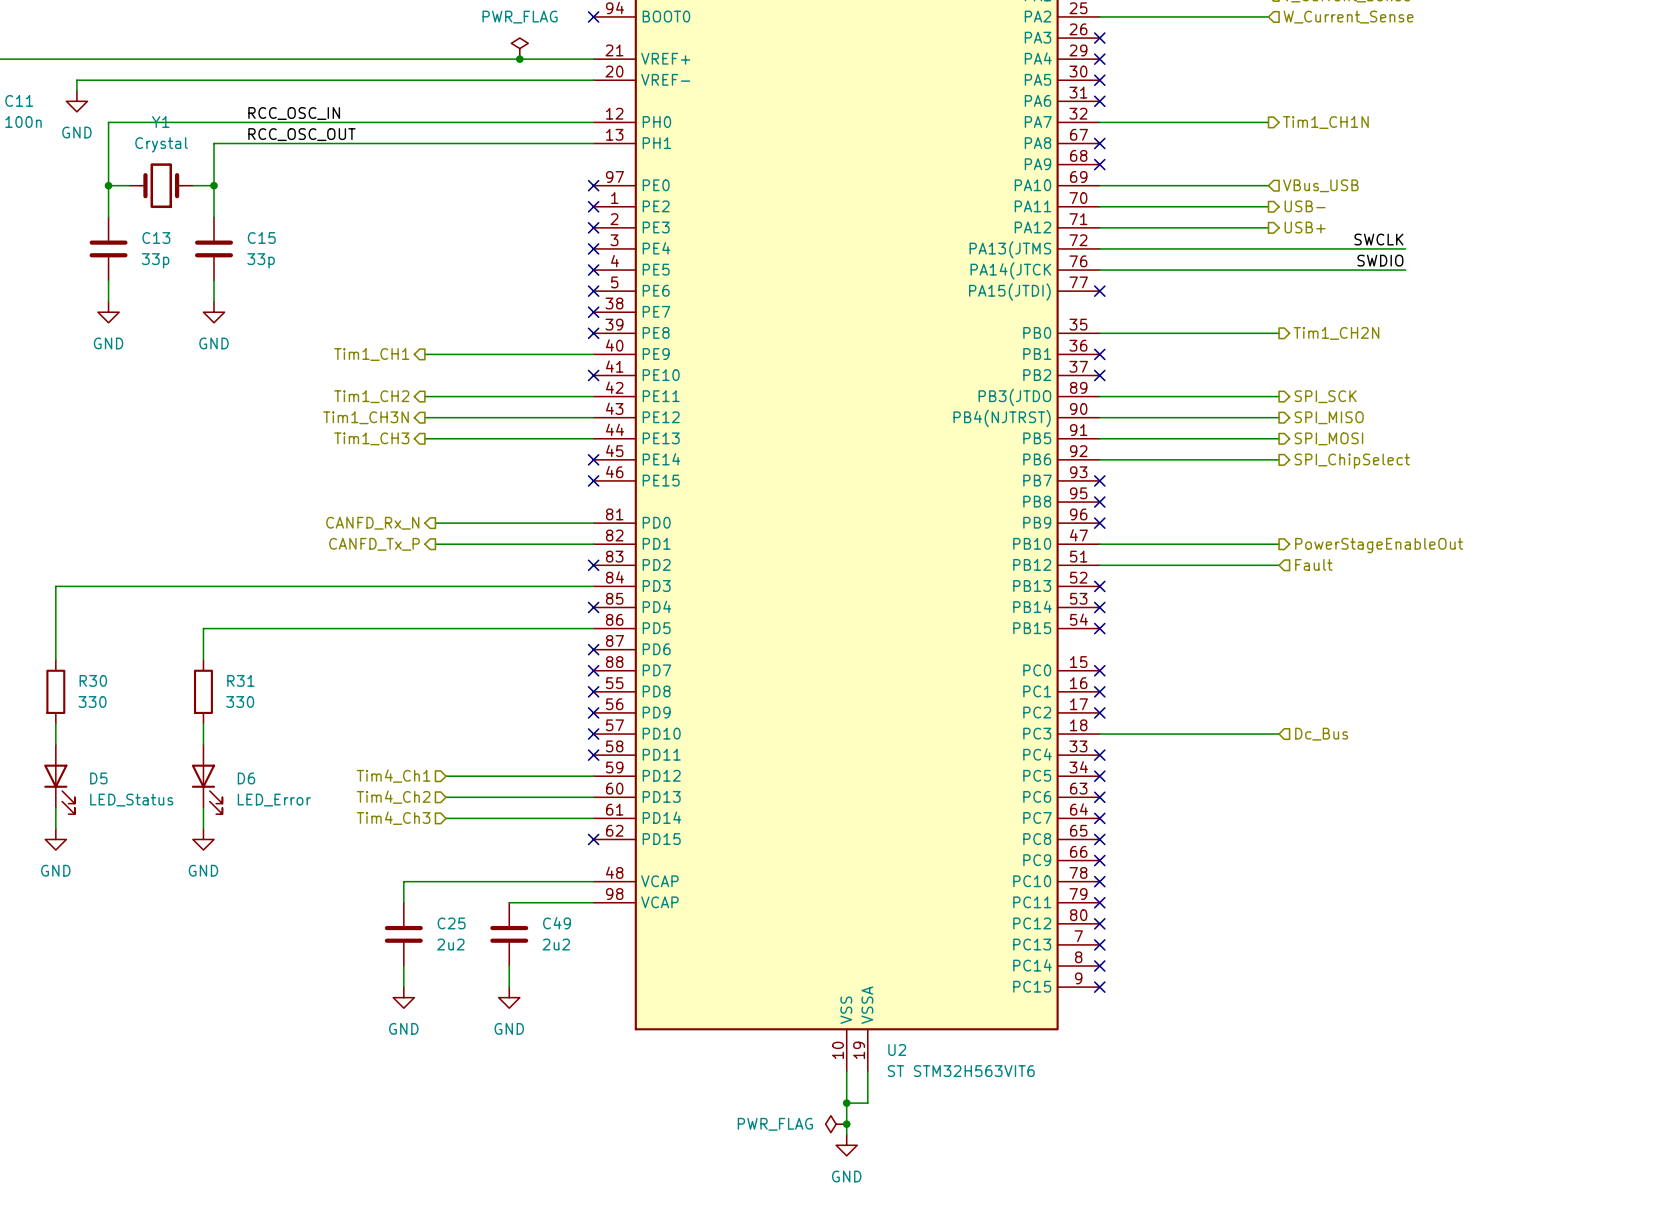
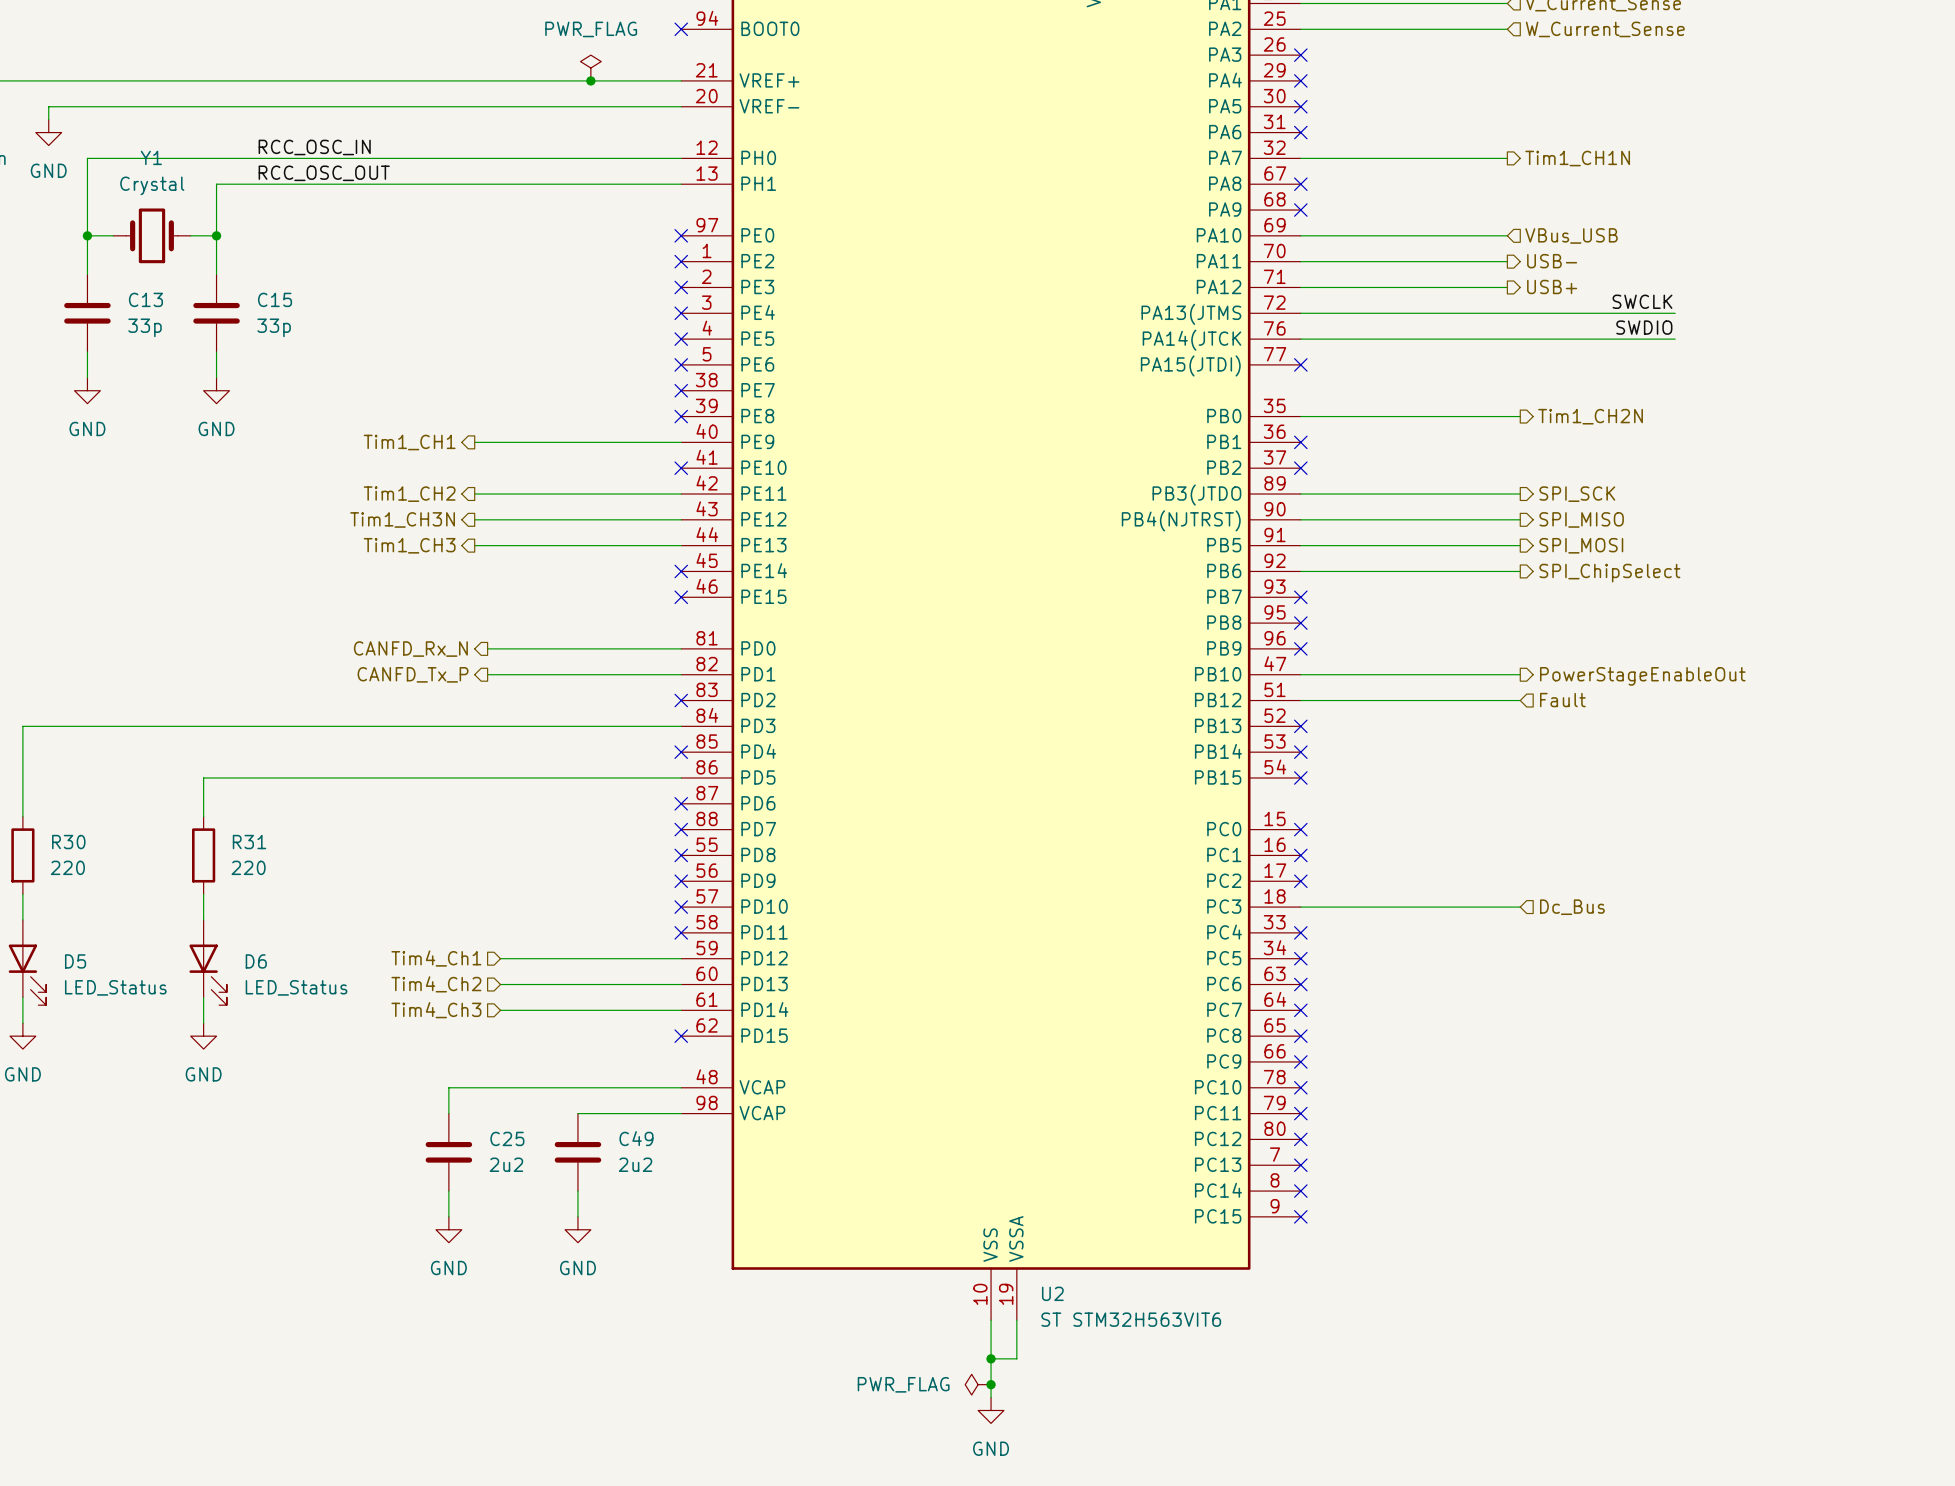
R30 value: 330 (92, 701) -> 220 (67, 867)
R31 value: 330 (240, 701) -> 220 (248, 867)
D6 value: LED_Error (274, 800) -> LED_Status (296, 987)

